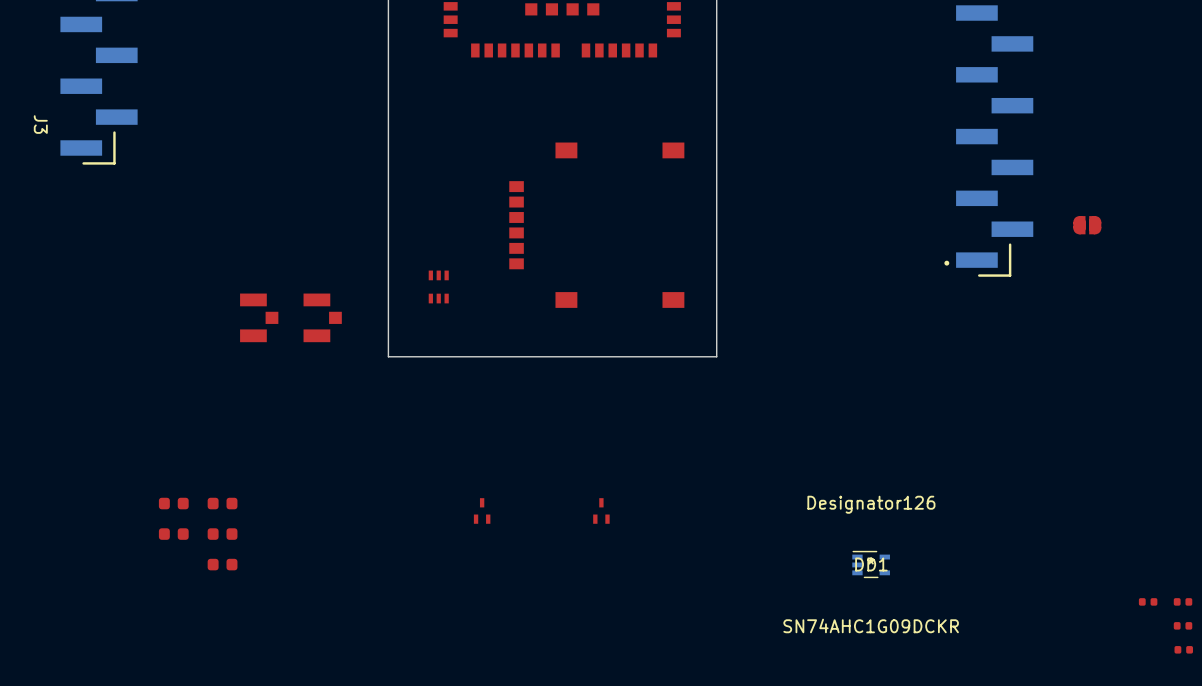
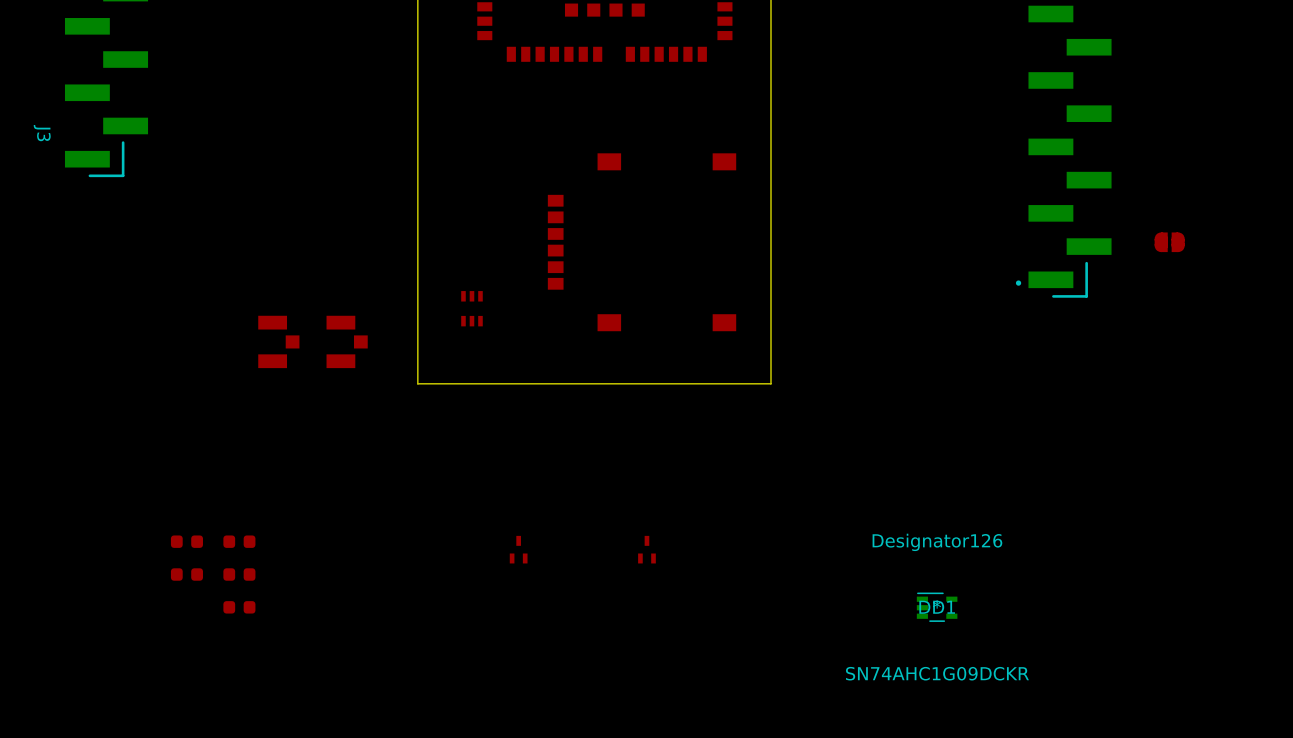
part: (1148, 601) -> none
part: (1183, 601) -> none
part: (1183, 625) -> none
part: (1183, 649) -> none

